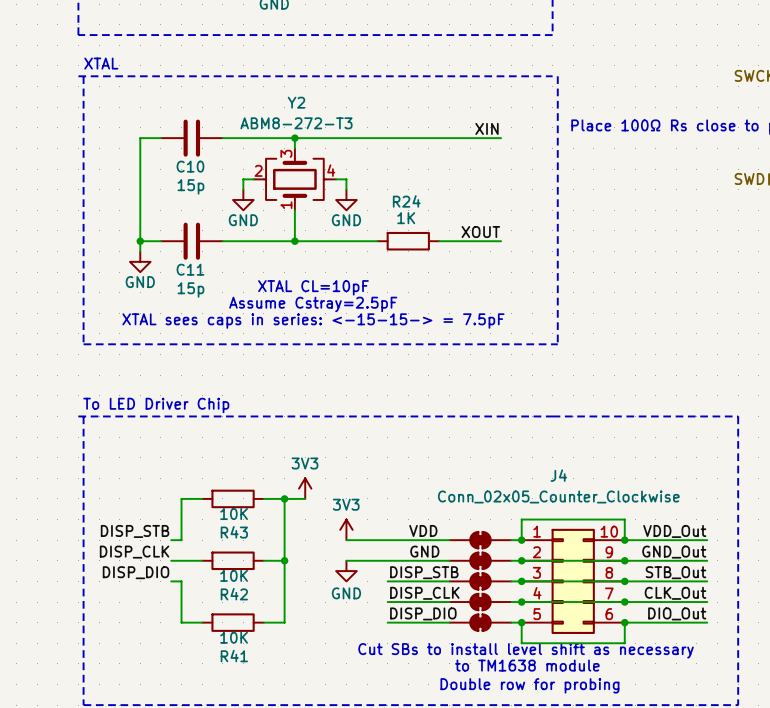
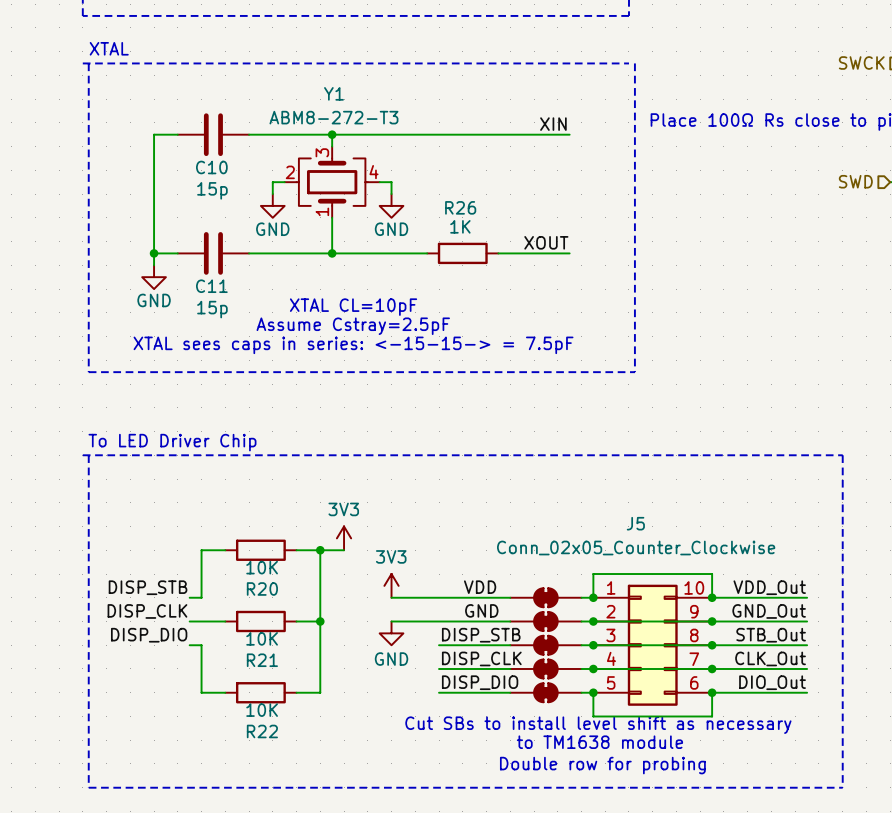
Y2 name: Y2 (296, 102) -> Y1 (333, 93)
R24 name: R24 (406, 201) -> R26 (460, 207)
J4 name: J4 (558, 475) -> J5 (635, 523)
R43 name: R43 (234, 532) -> R20 (262, 588)
R42 name: R42 (234, 594) -> R21 (262, 660)
R41 name: R41 (234, 656) -> R22 (262, 731)

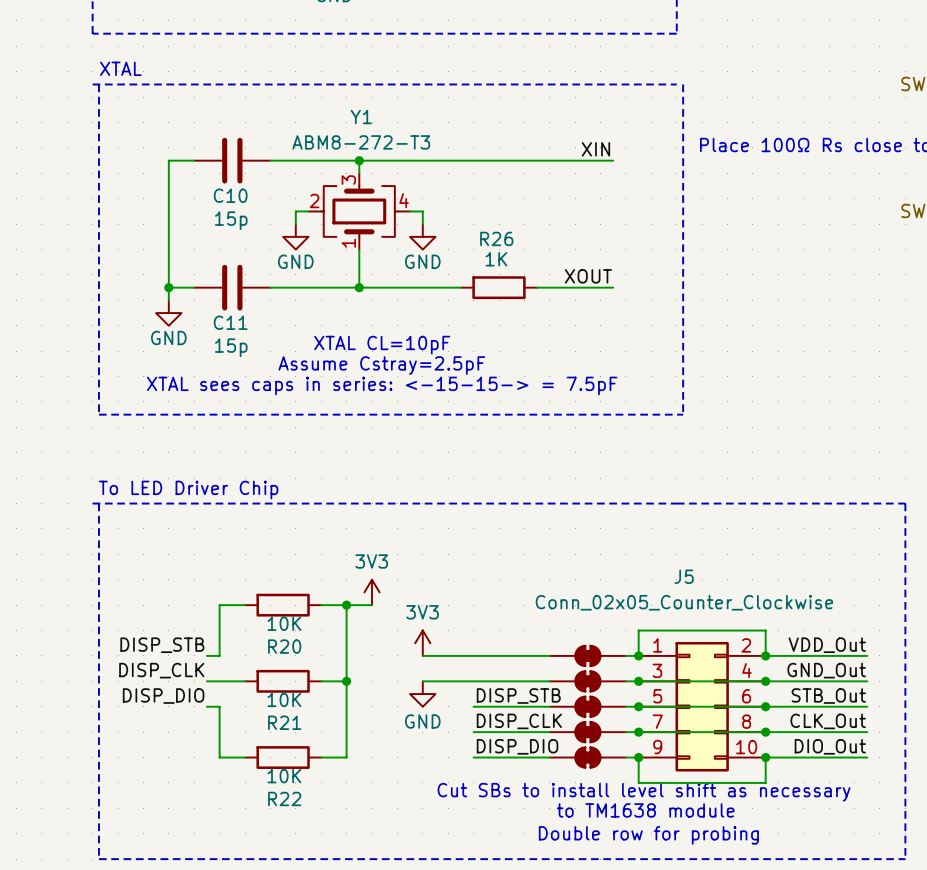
J5 symbol: [593, 584, 713, 706] -> [638, 641, 766, 772]
label: VDD (480, 587) -> none
label: GND (481, 610) -> none

